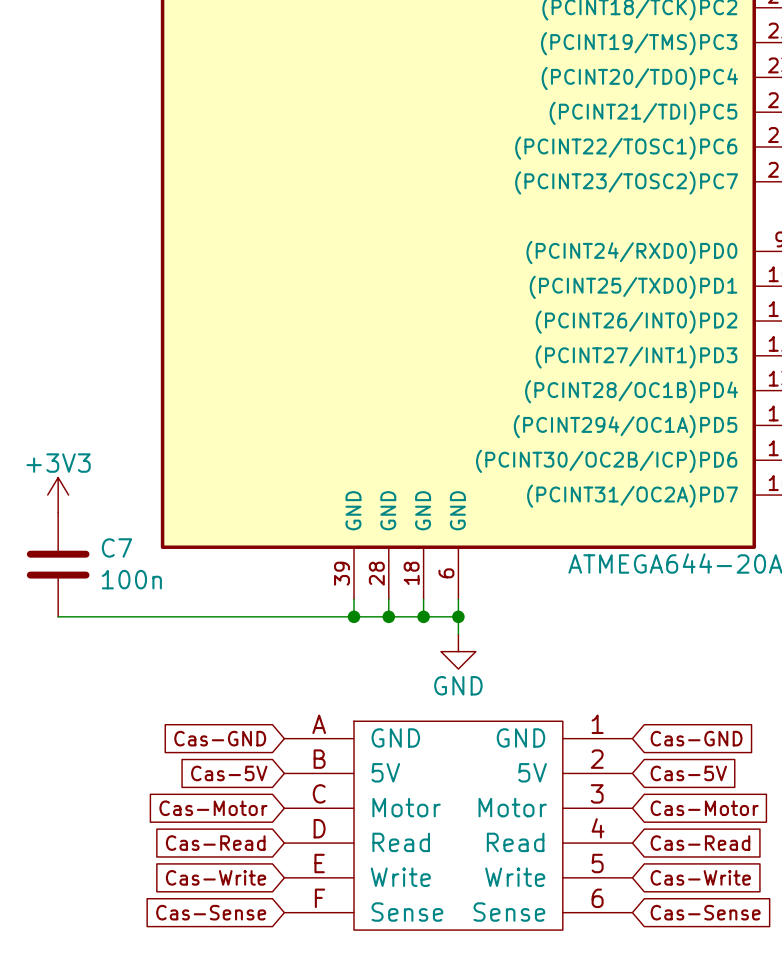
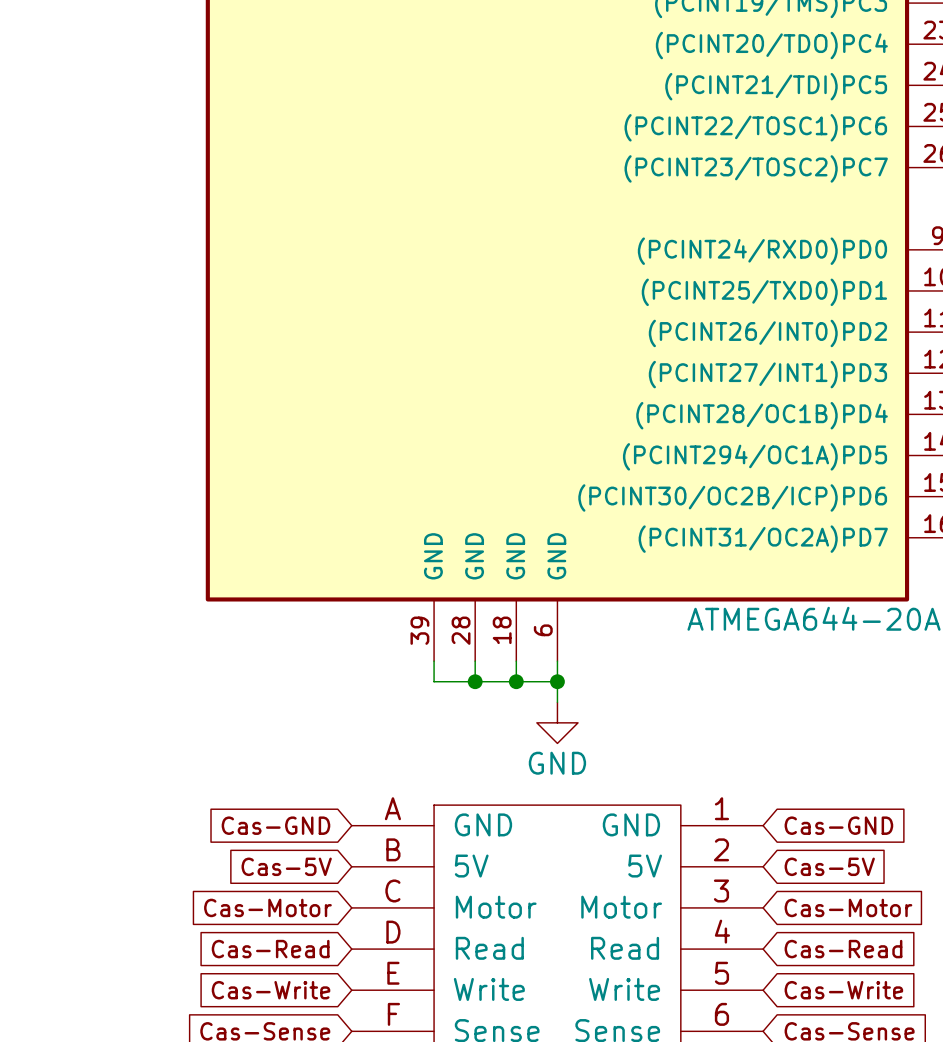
power symbol: +3V3 (58, 495) -> none
C7: 100n (58, 564) -> none
wire: (58, 616) (353, 616) -> none
junction: (353, 616) -> none

